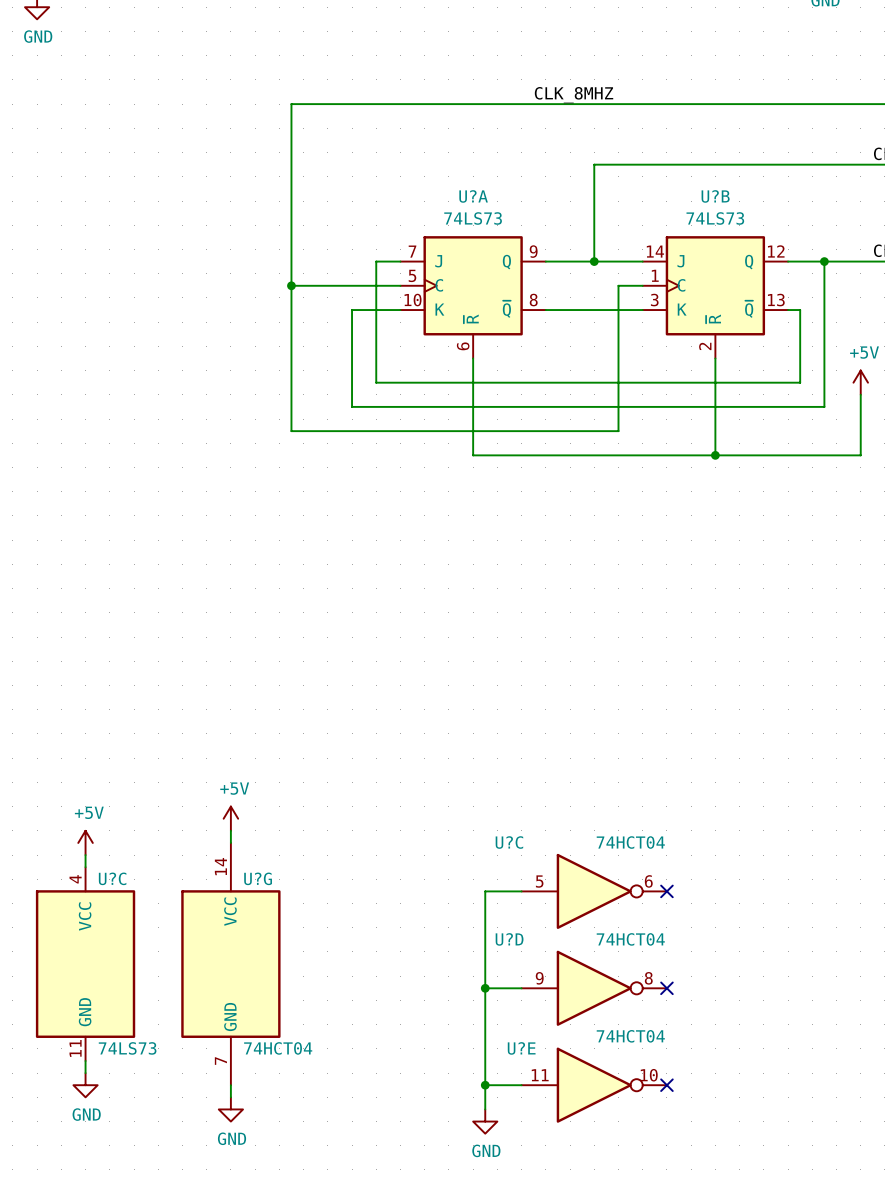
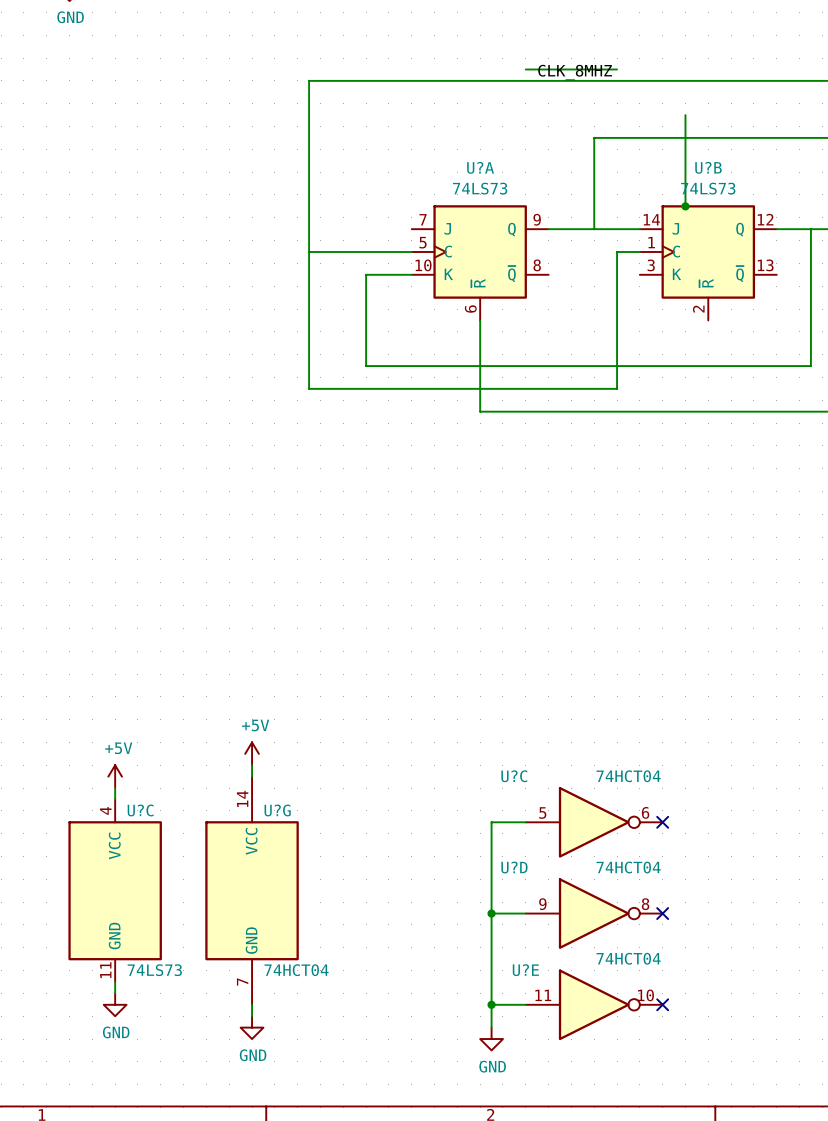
junction: none -> (685, 206)
wire: (400, 261) (376, 261) (376, 382) (800, 382) (800, 310) (788, 310) -> none
junction: (594, 261) -> none
junction: (824, 261) -> none
junction: (291, 285) -> none
wire: (545, 310) (642, 310) -> (525, 69) (617, 69)
wire: (715, 358) (715, 455) -> (685, 115) (685, 206)
junction: (715, 455) -> none

